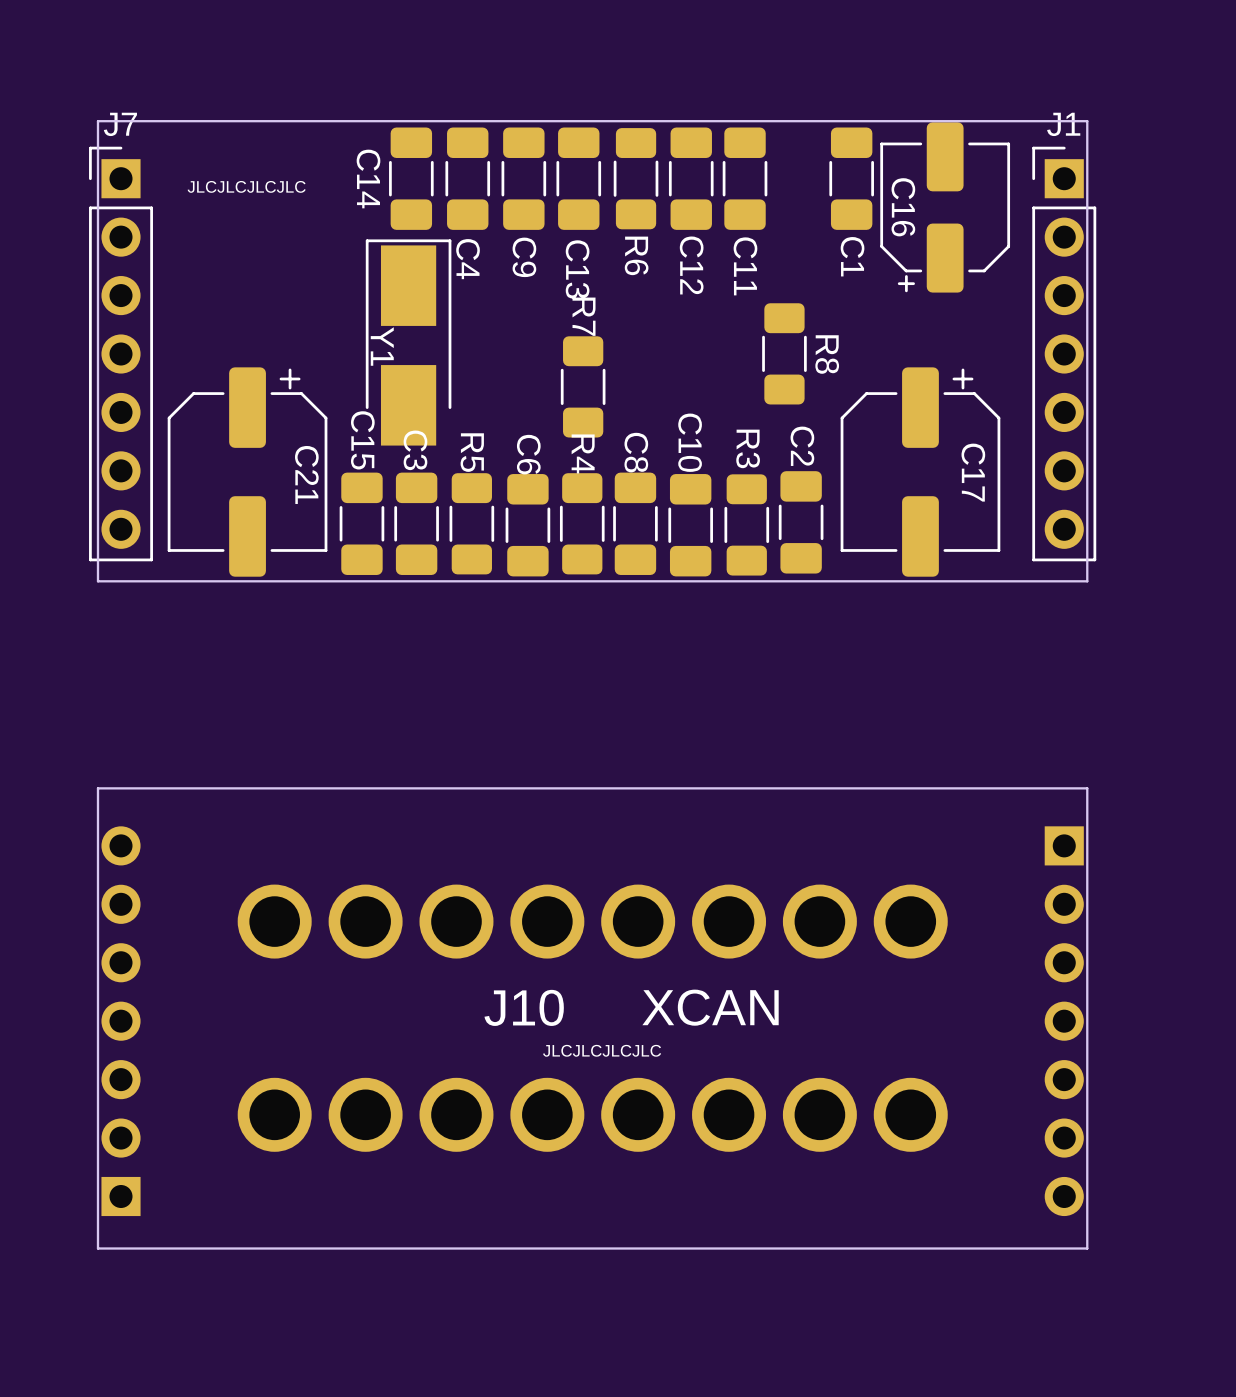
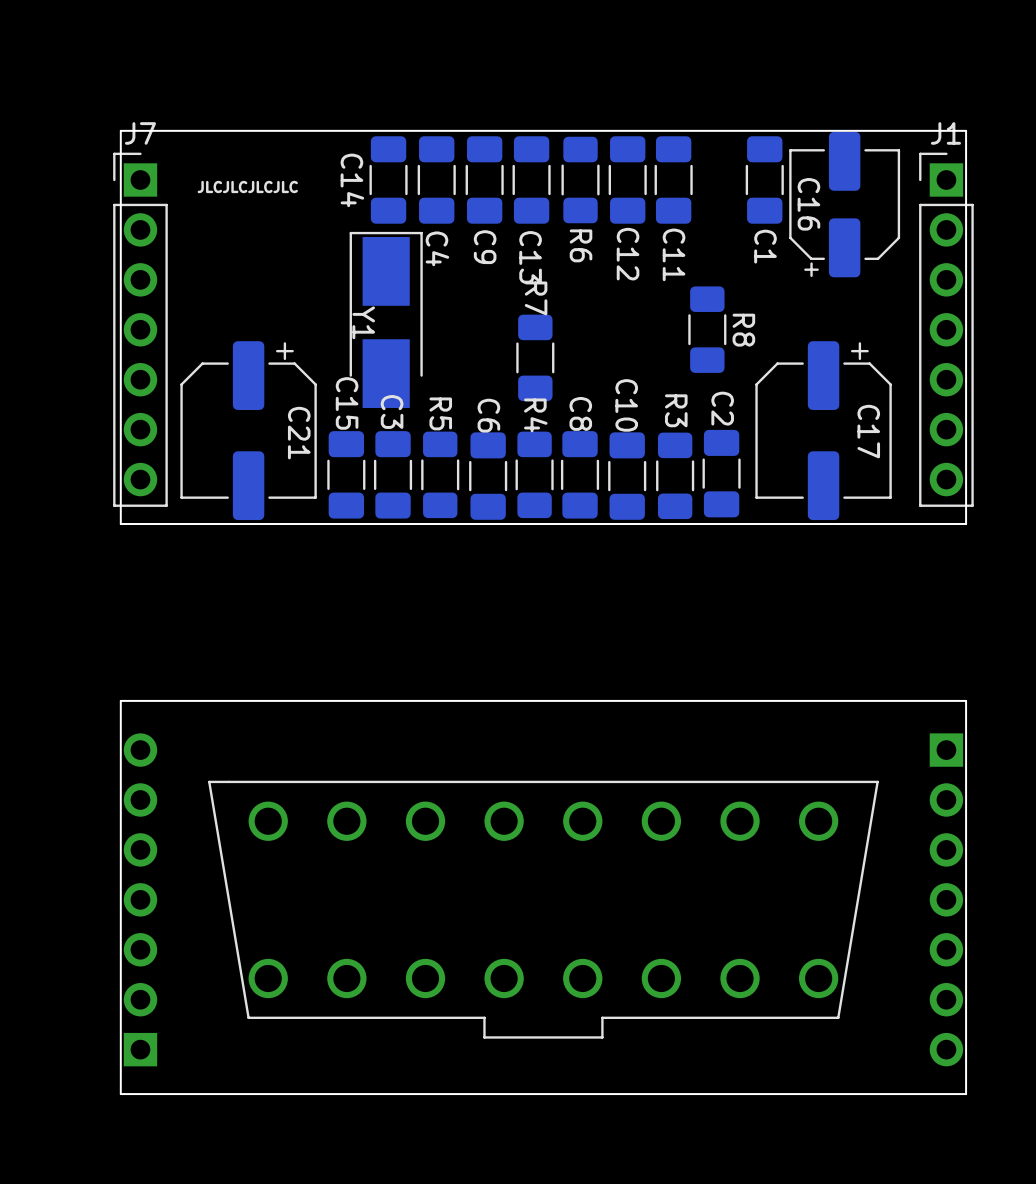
J10: XCAN (592, 1018) -> none
part: none -> (543, 909)
text: JLCJLCJLCJLC (602, 1050) -> none

